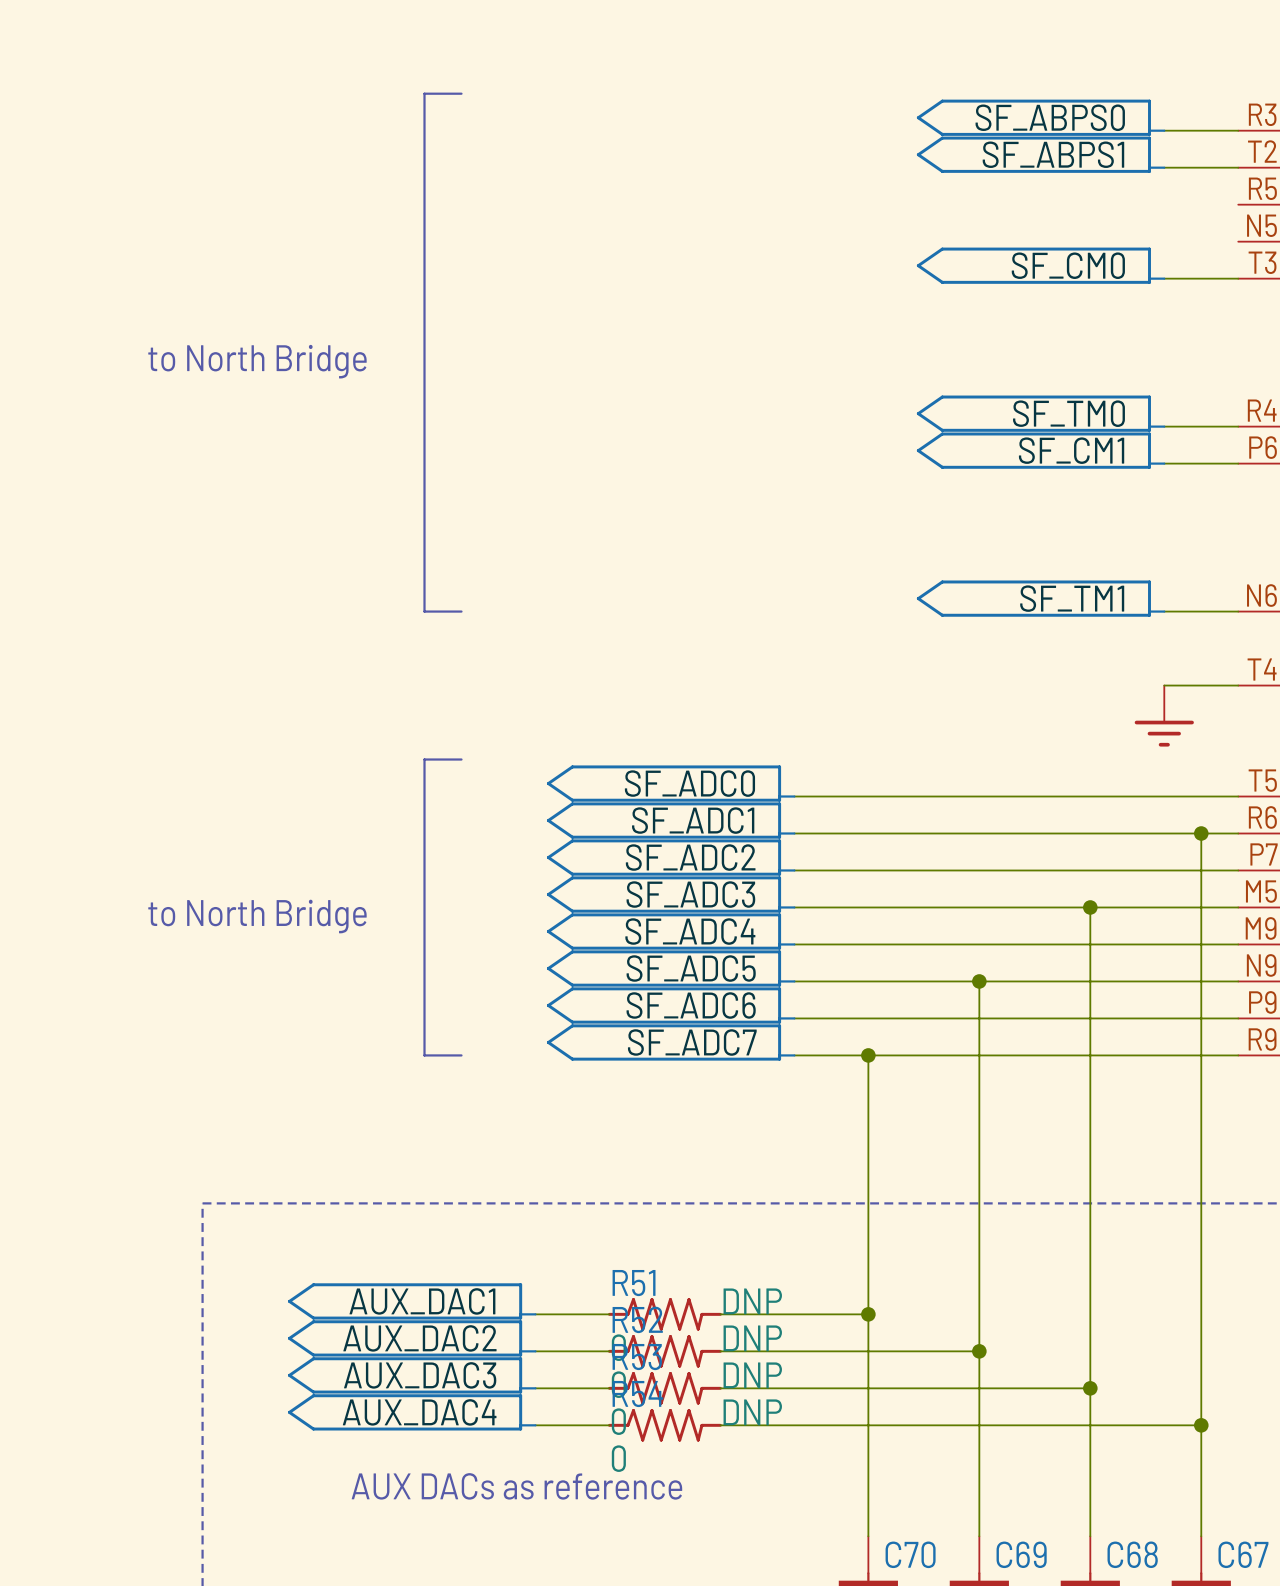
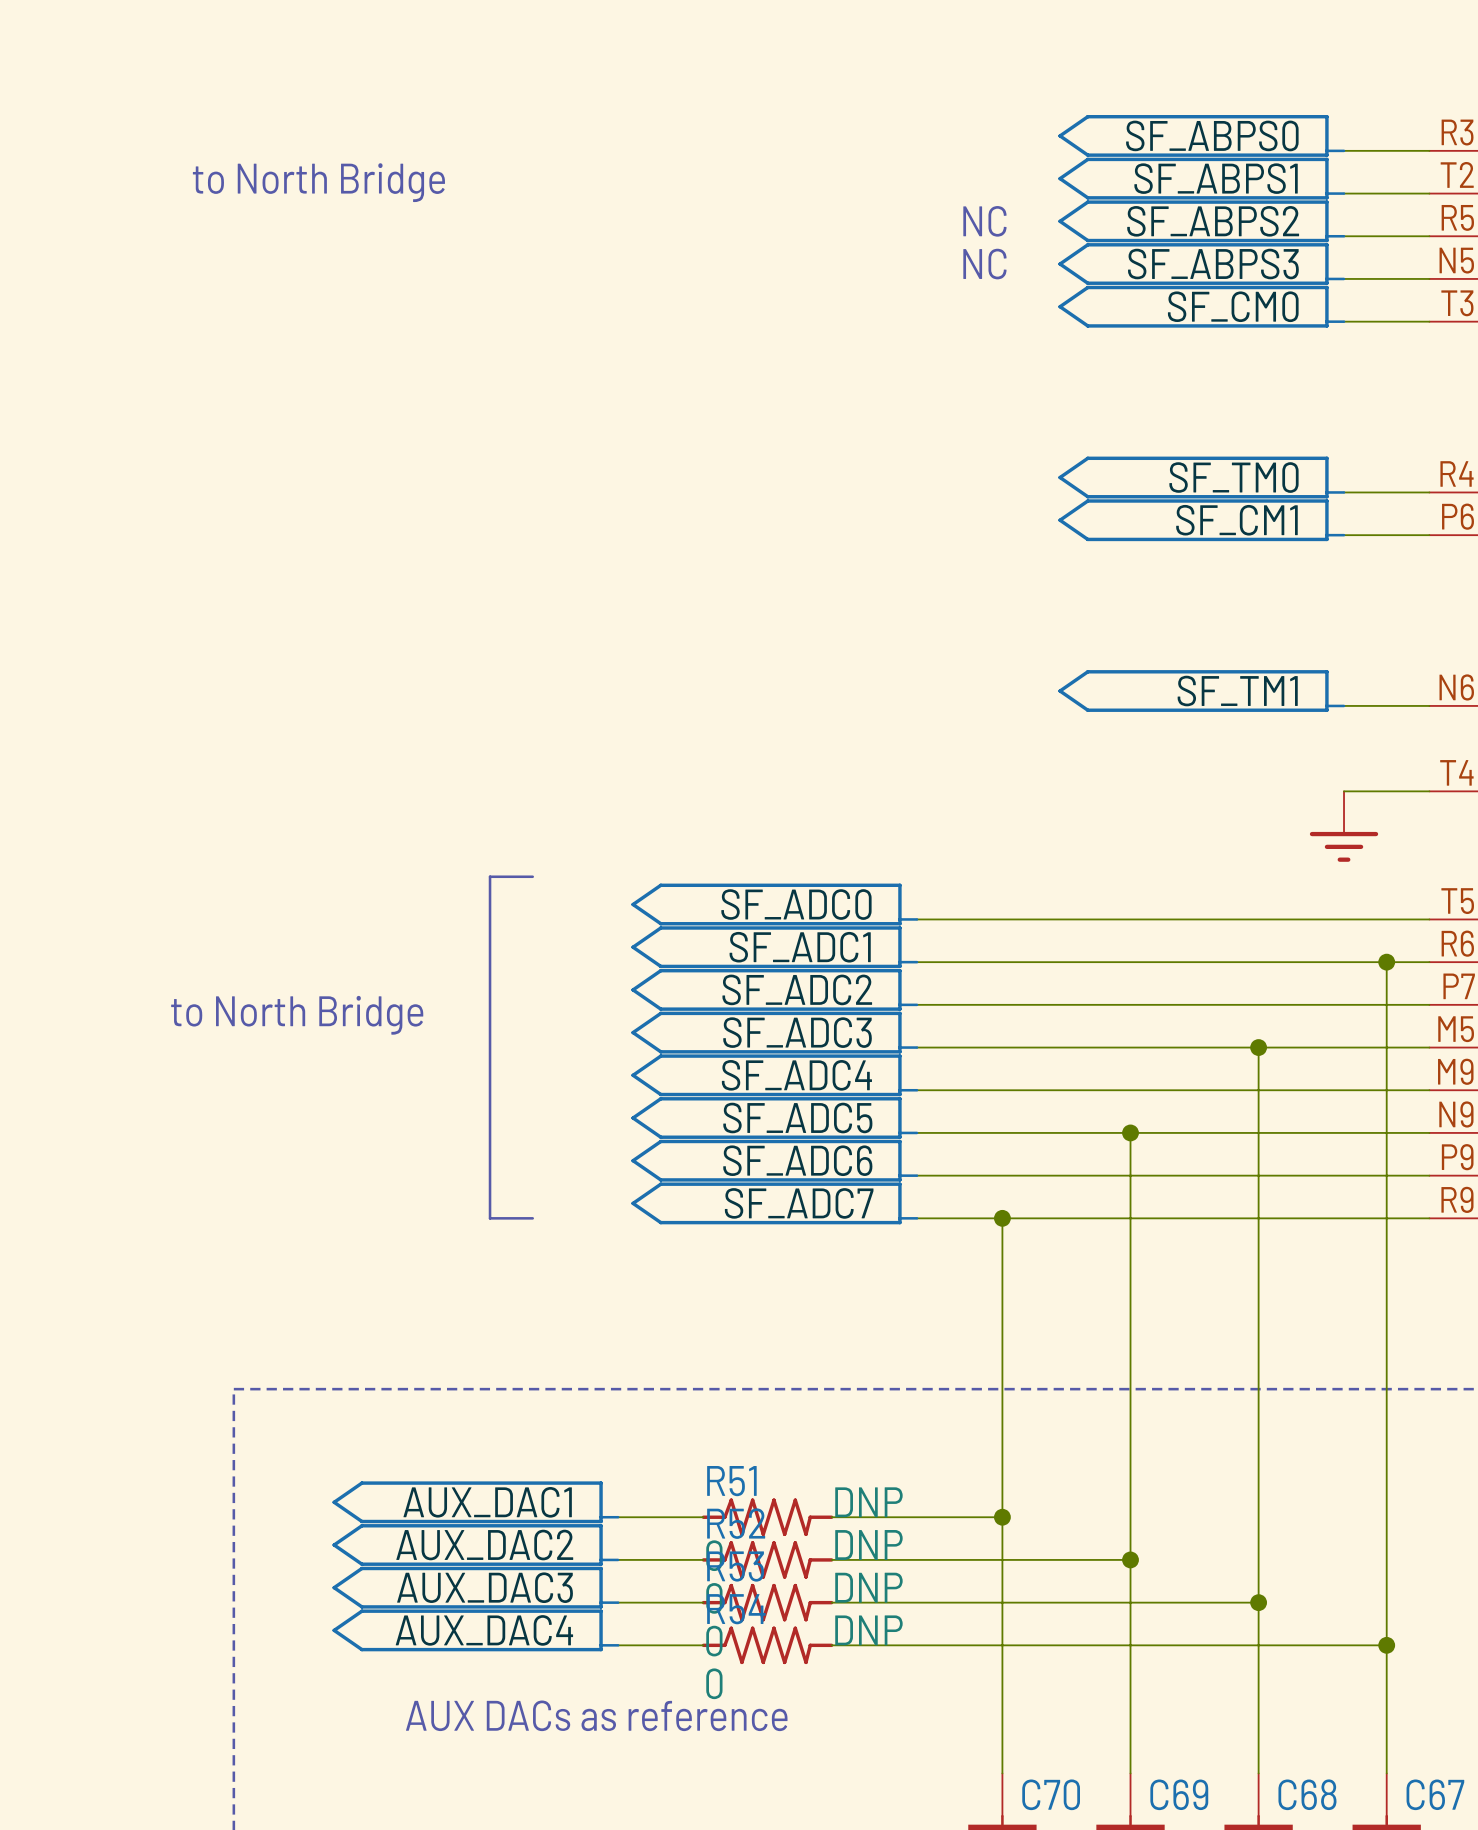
line: (461, 93) (424, 93) (424, 611) (461, 611) -> none
text: none -> to North Bridge (318, 182)
text: none -> NC (984, 221)
part: none -> (1201, 221)
label: none -> SF_ABPS2 (1213, 221)
wire: none -> (1344, 236) (1429, 236)
text: none -> NC (984, 264)
part: none -> (1201, 264)
label: none -> SF_ABPS3 (1213, 264)
wire: none -> (1344, 278) (1429, 278)
text: to North Bridge (257, 361) -> none
text position: to North Bridge (257, 916) -> to North Bridge (297, 1015)

